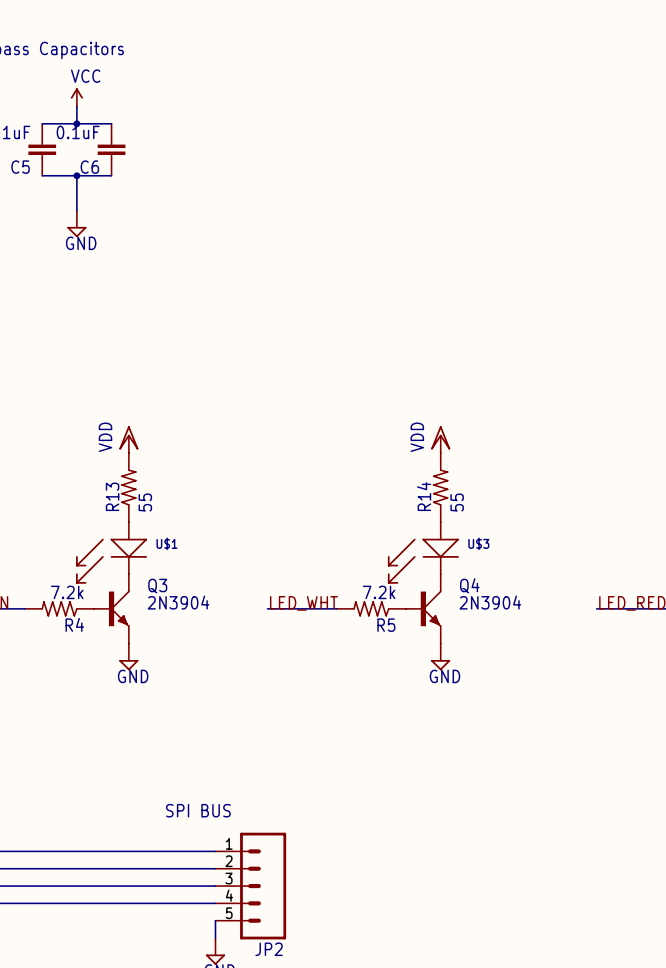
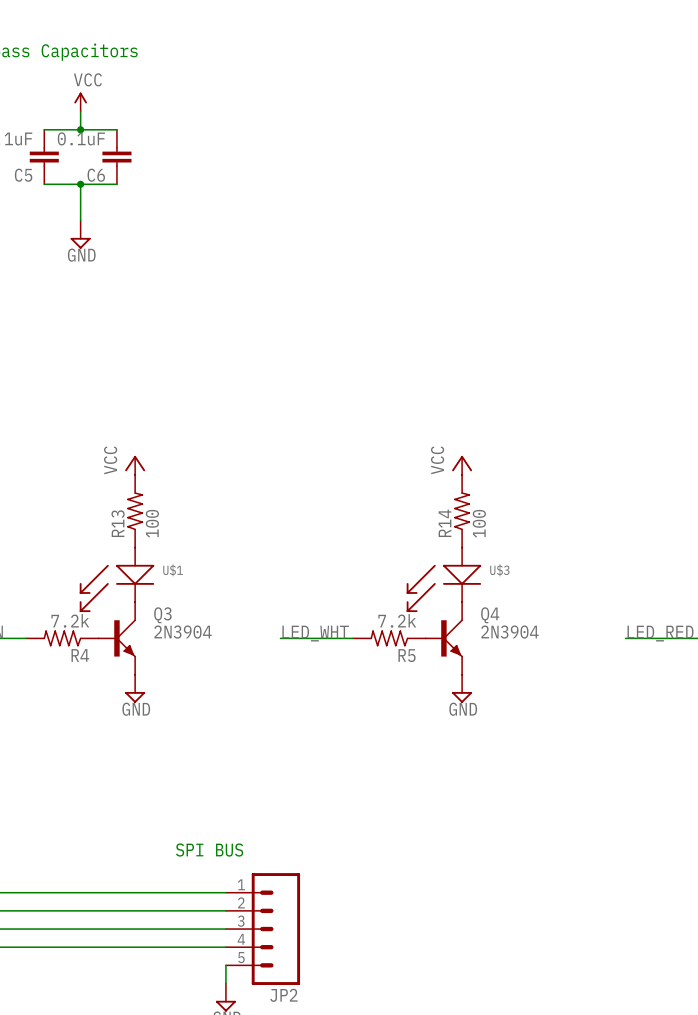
power symbol: VDD (128, 439) -> VCC (135, 465)
power symbol: VDD (440, 439) -> VCC (462, 465)
R13 value: 55 (145, 502) -> 100 (152, 523)
R14 value: 55 (457, 502) -> 100 (479, 523)

